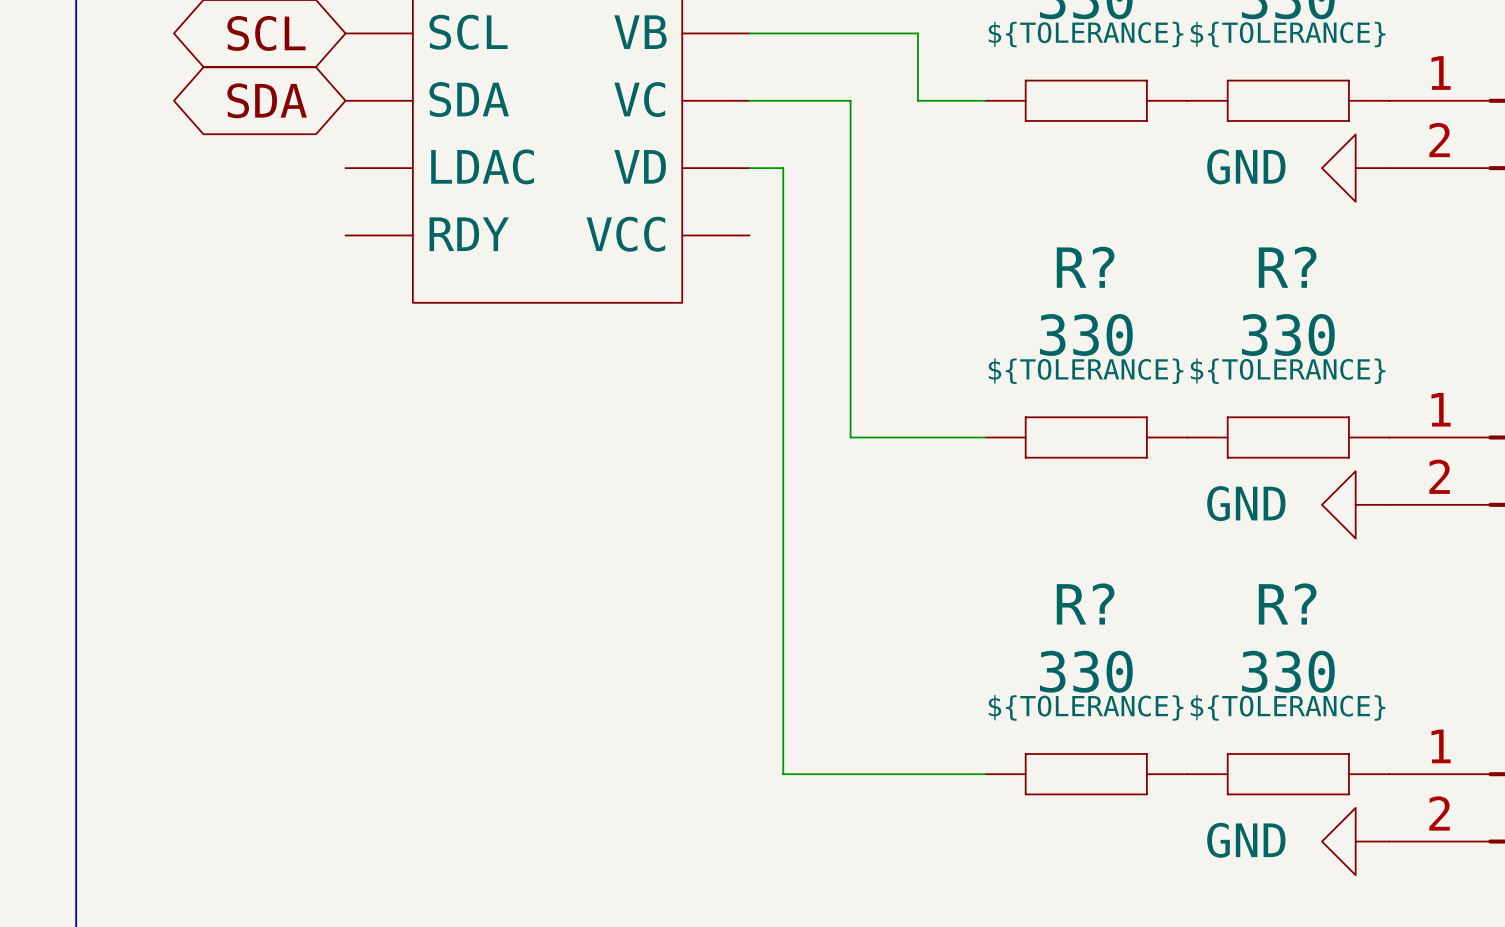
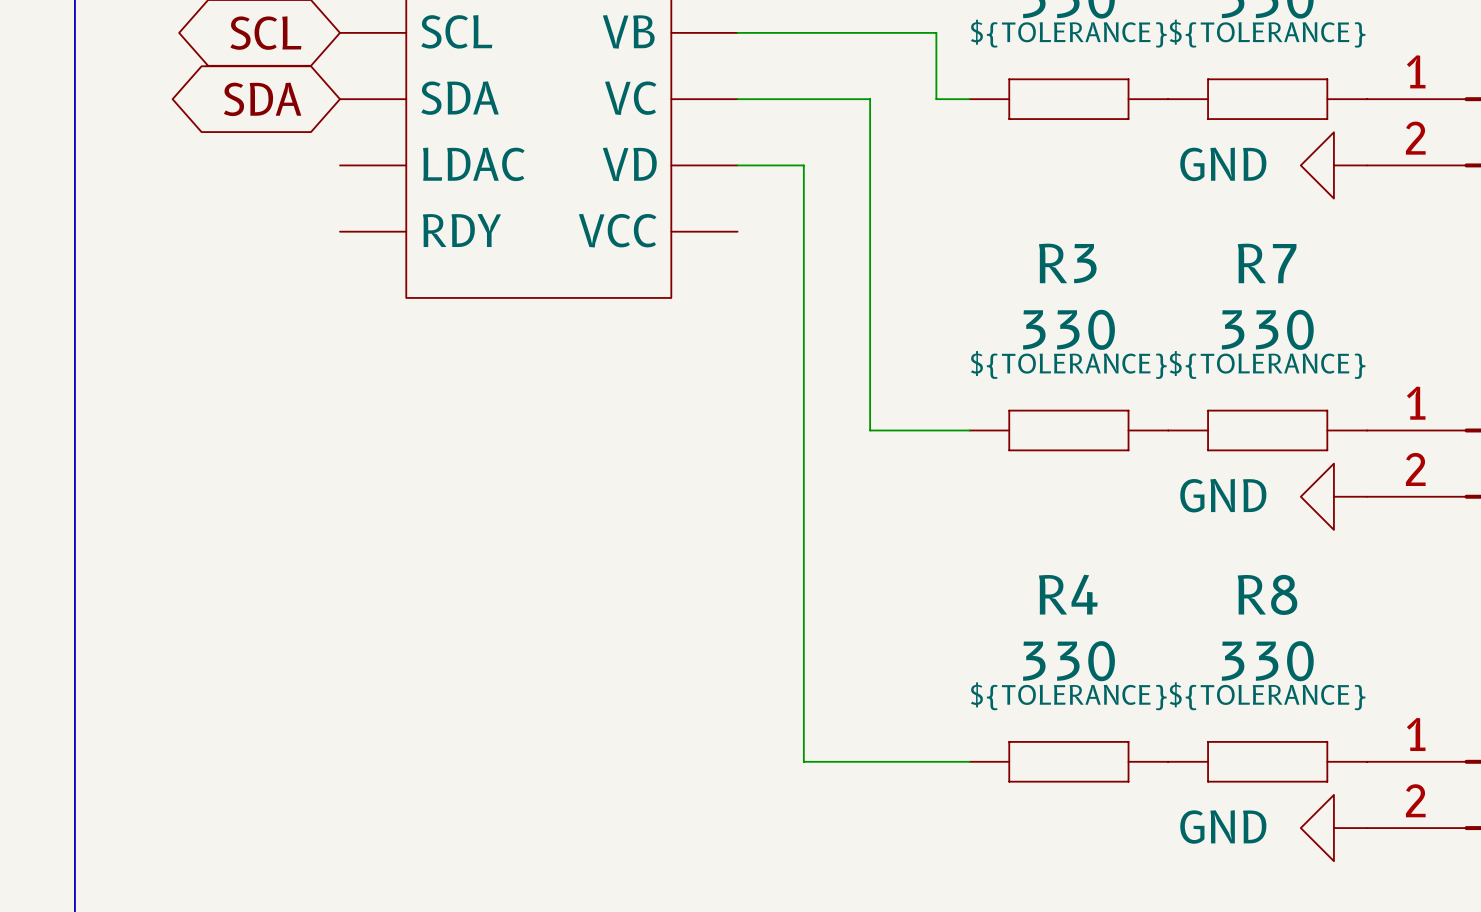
wire: (917, 33) (917, 100) (951, 100) -> (903, 32) (936, 32) (936, 99)
wire: (850, 100) (850, 437) (884, 437) -> (836, 99) (870, 99) (870, 430)
wire: (783, 168) (783, 774) (816, 774) -> (770, 165) (803, 165) (803, 761)
R? name: R? (1085, 267) -> R3 (1067, 263)
R? name: R? (1287, 267) -> R7 (1267, 263)
R? name: R? (1085, 603) -> R4 (1068, 594)
R? name: R? (1287, 603) -> R8 (1267, 594)

